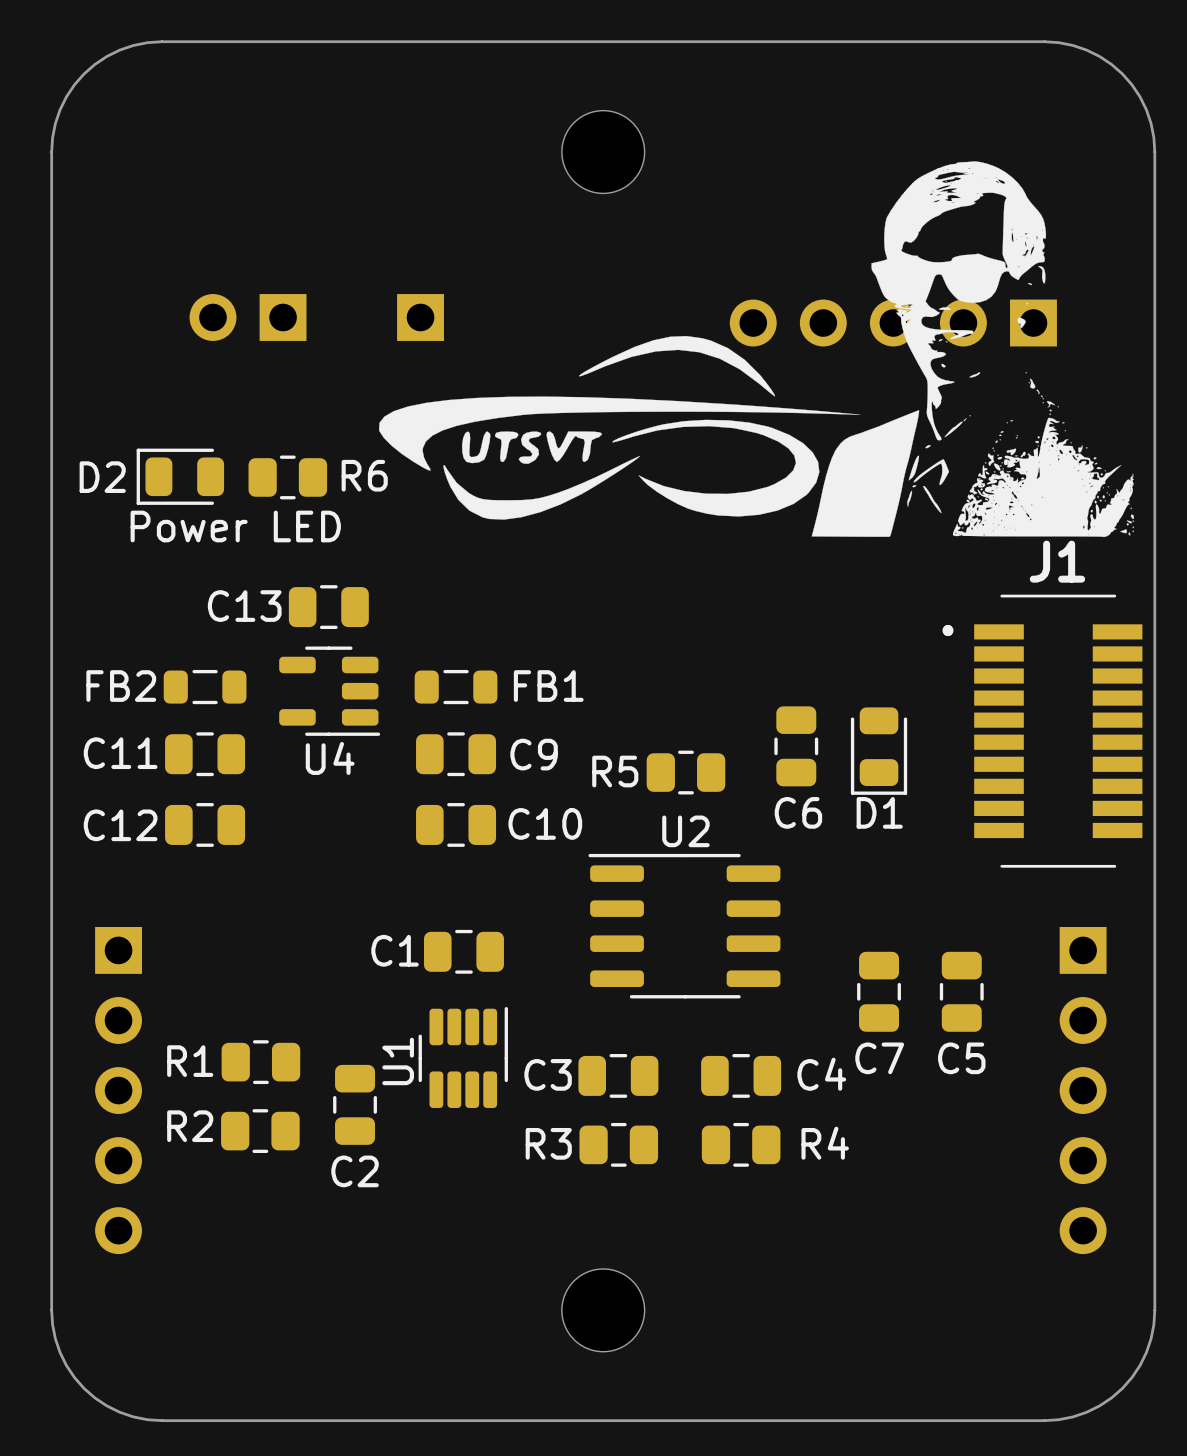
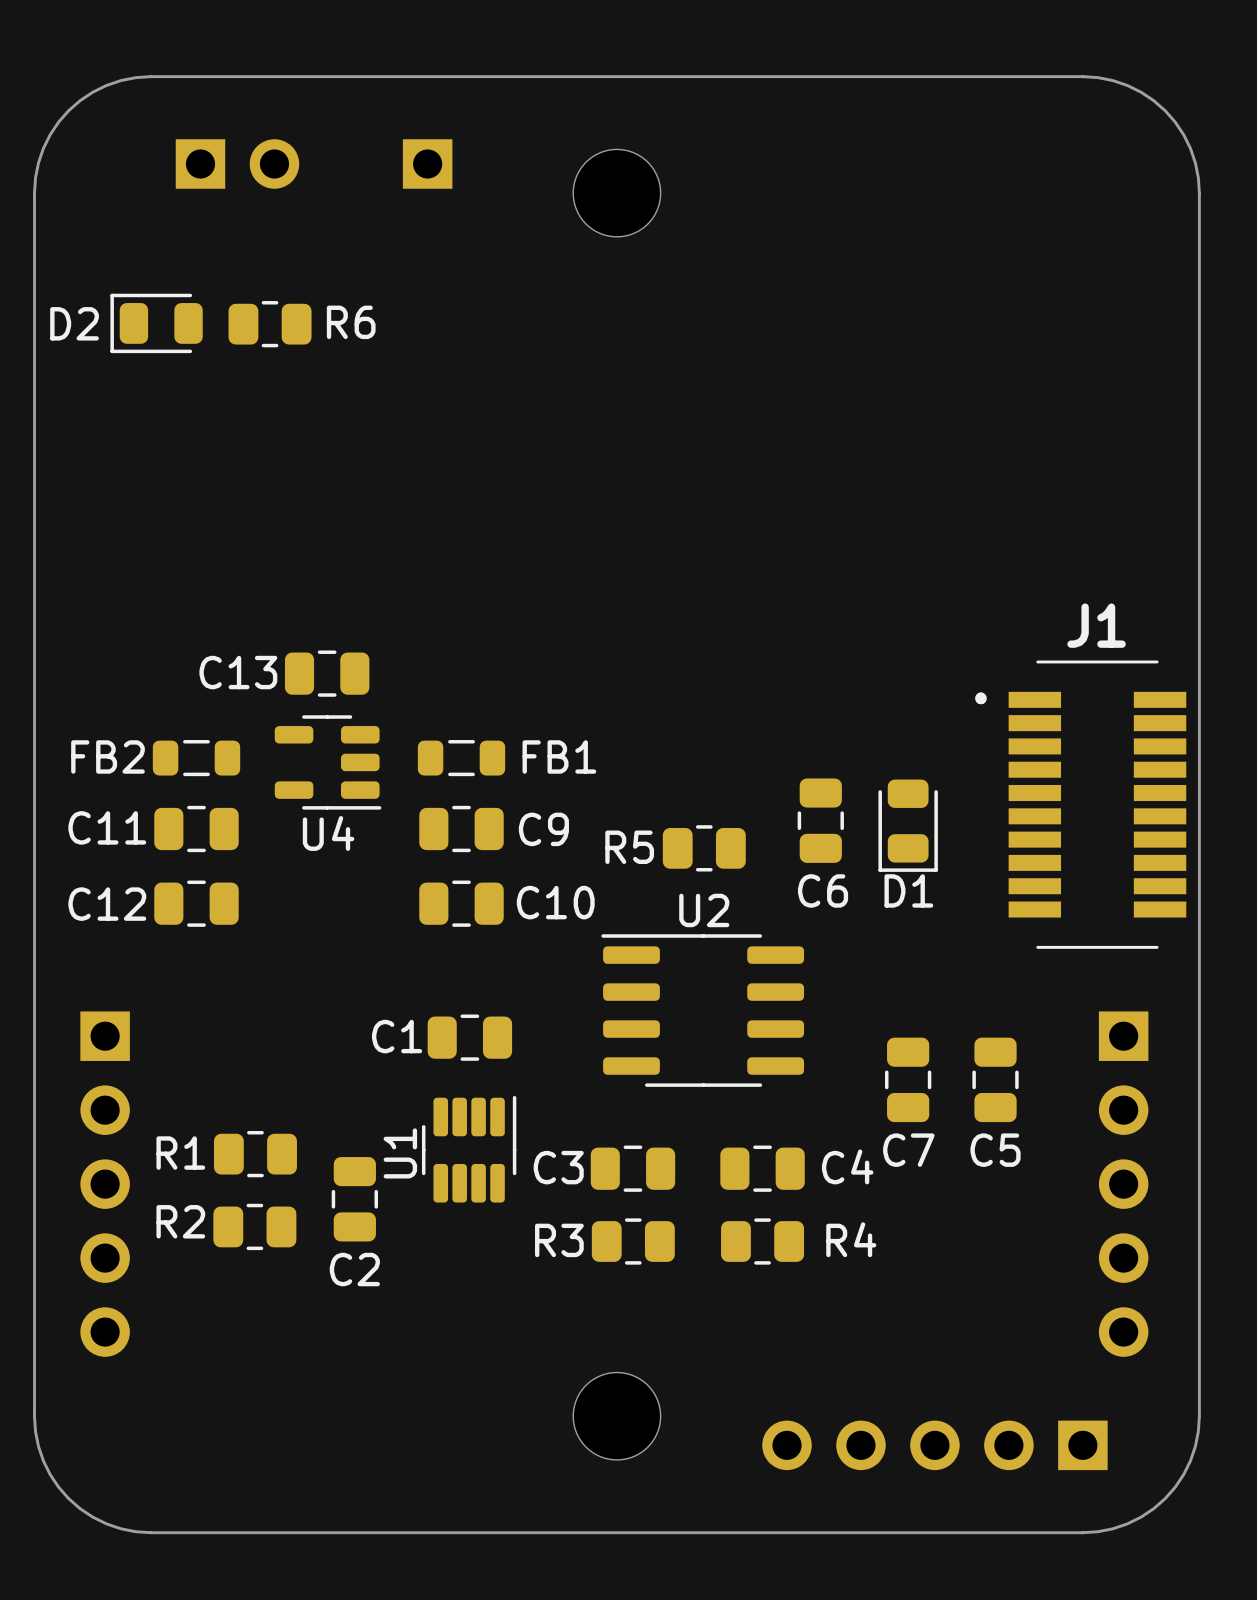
drawing: [379, 161, 1134, 538] -> none
part rotation: 0° (248, 317) -> 180° (237, 164)
part position: (248, 317) -> (237, 164)
part position: (420, 317) -> (427, 164)
part: (893, 323) -> none
D2 position: (180, 476) -> (156, 323)
R6 position: (287, 477) -> (270, 324)
text: Power LED (235, 526) -> none
part: none -> (934, 1445)

